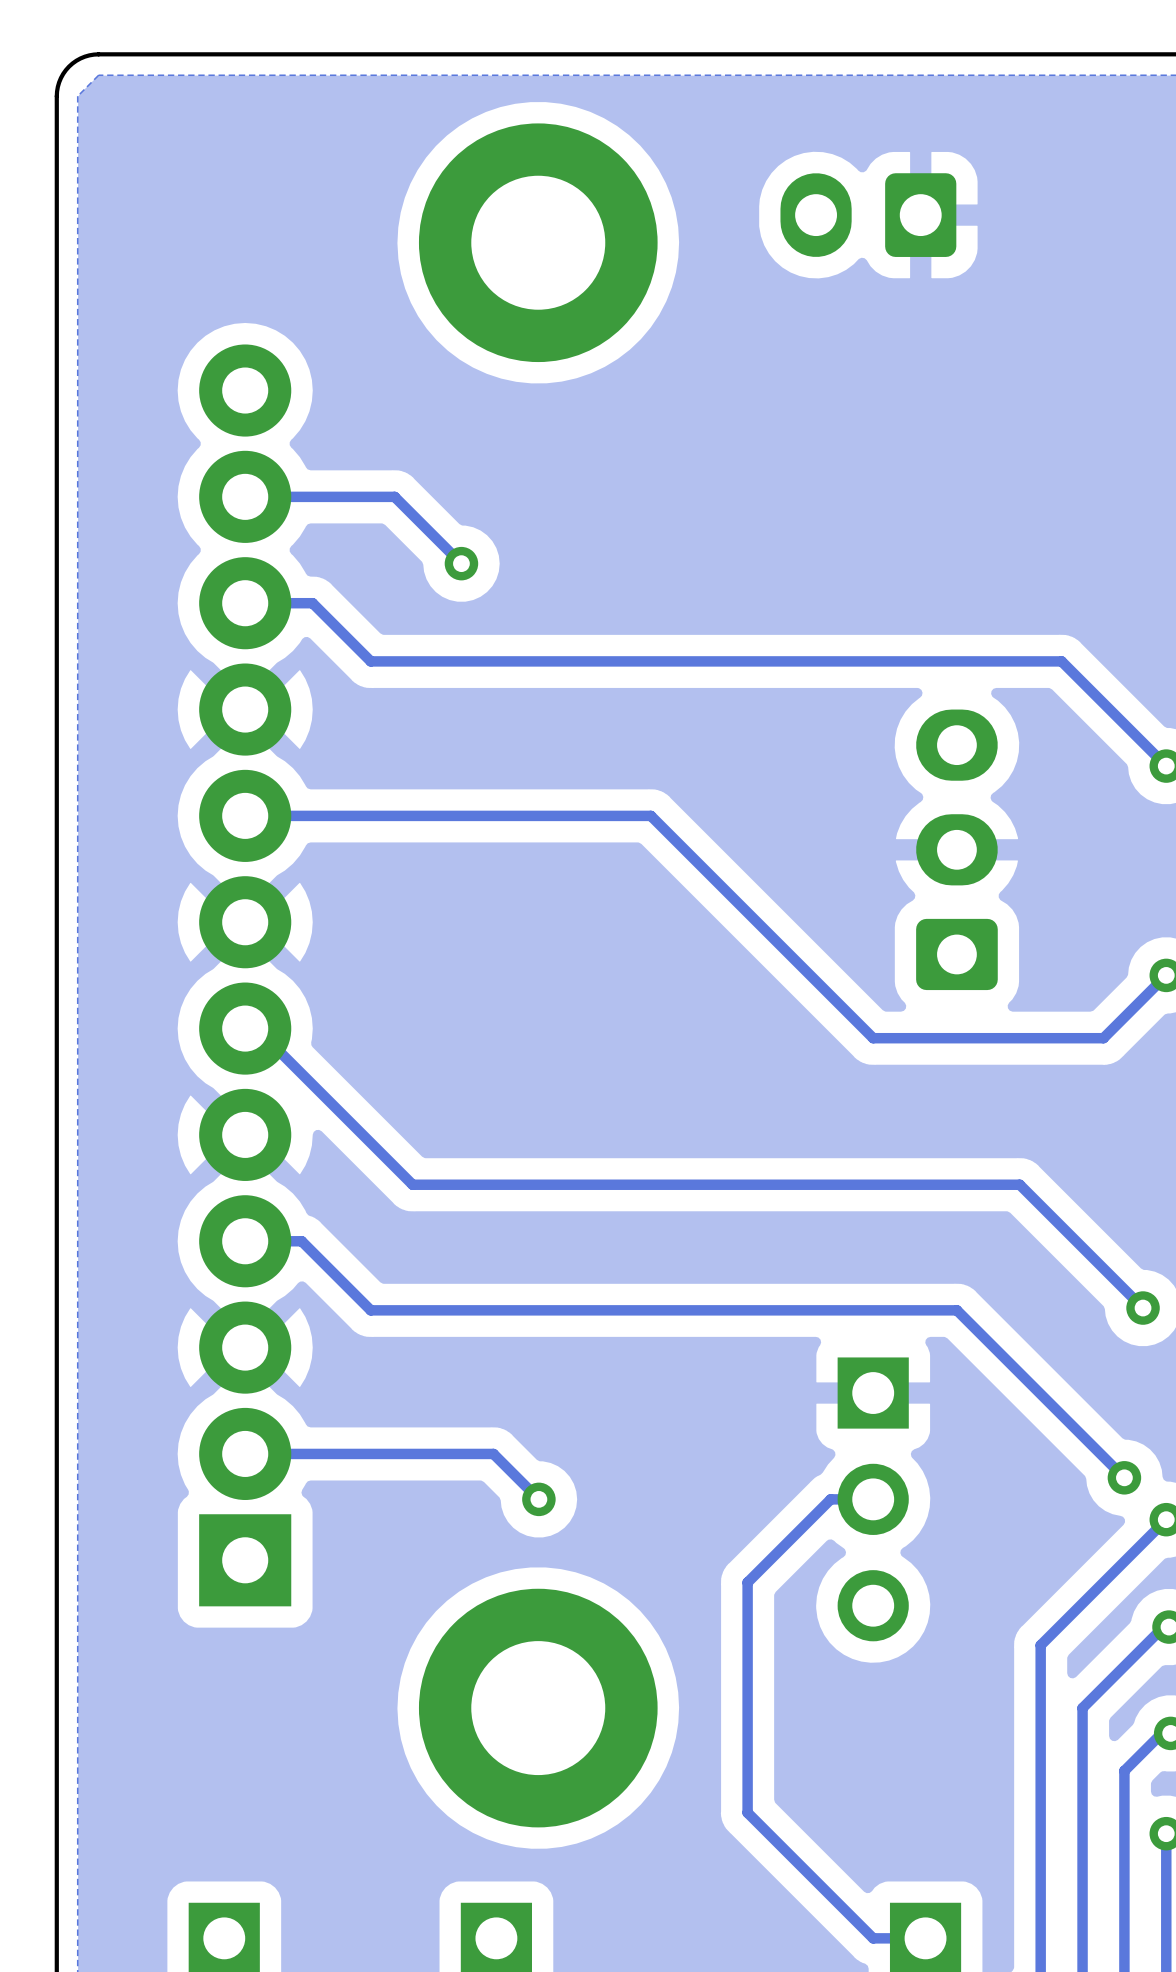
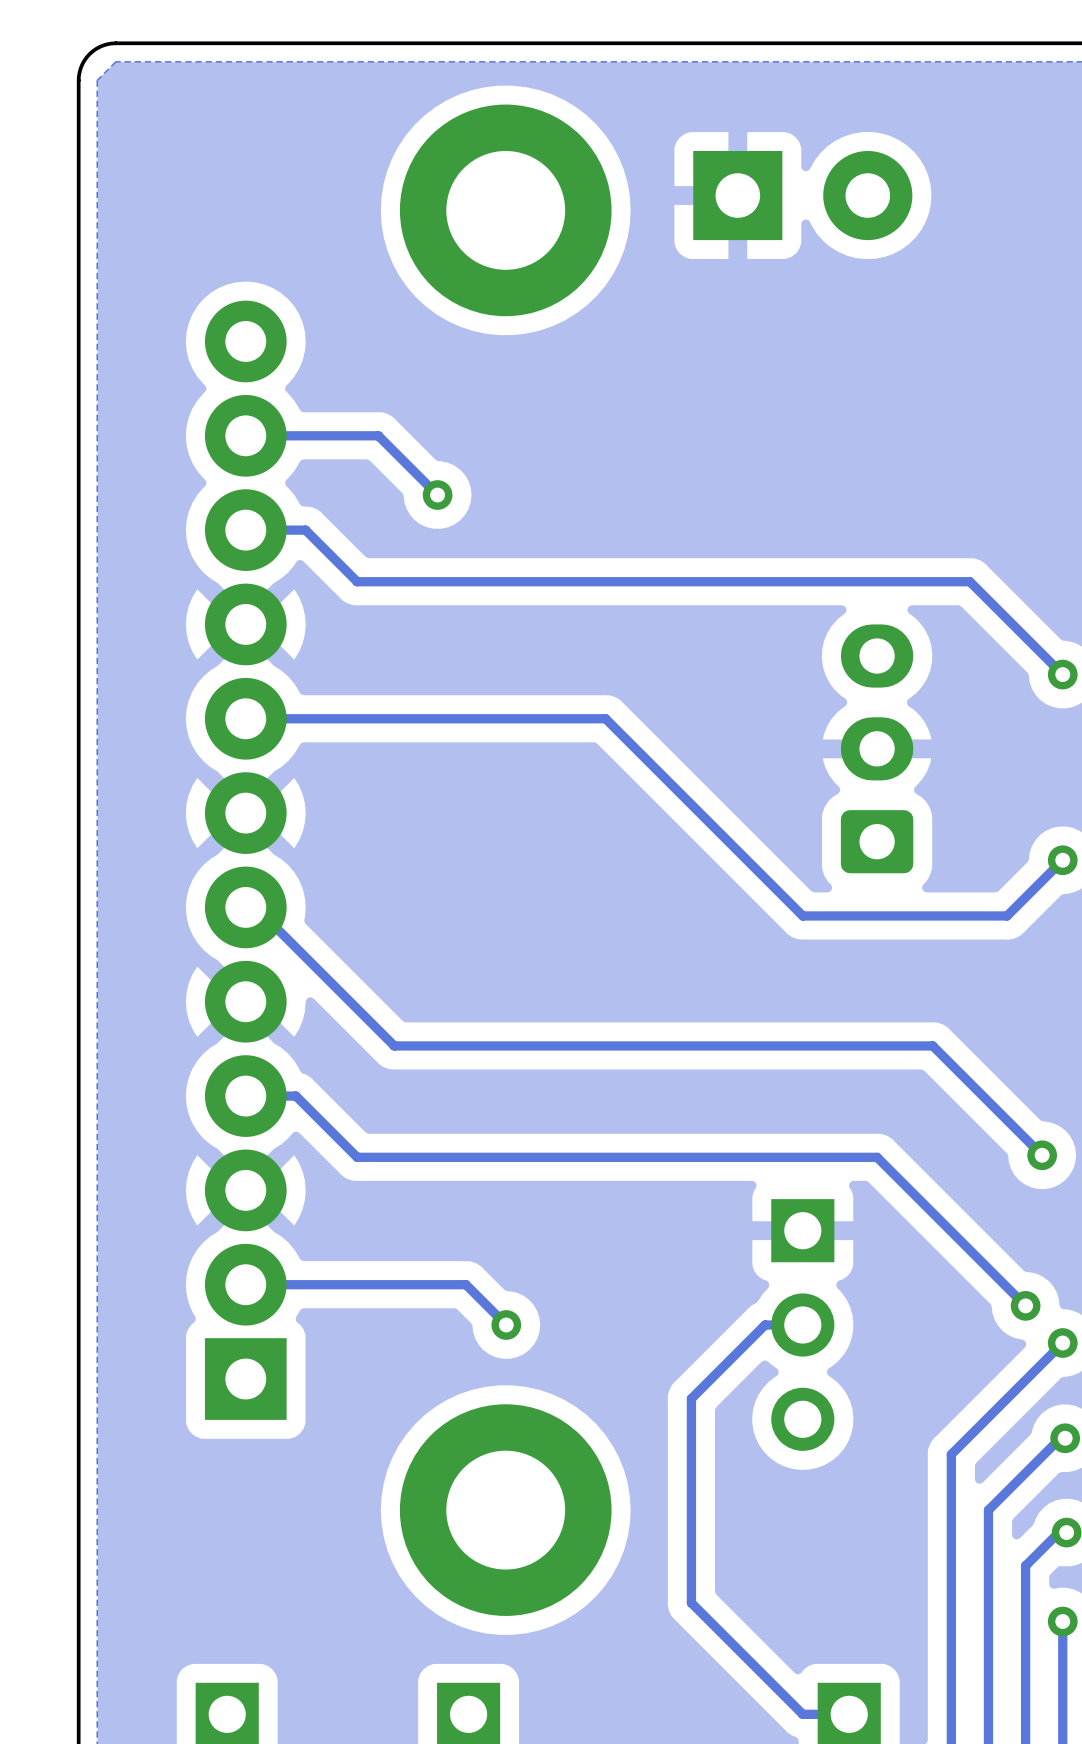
part footprint: [780, 173, 957, 257] -> [693, 150, 913, 241]

